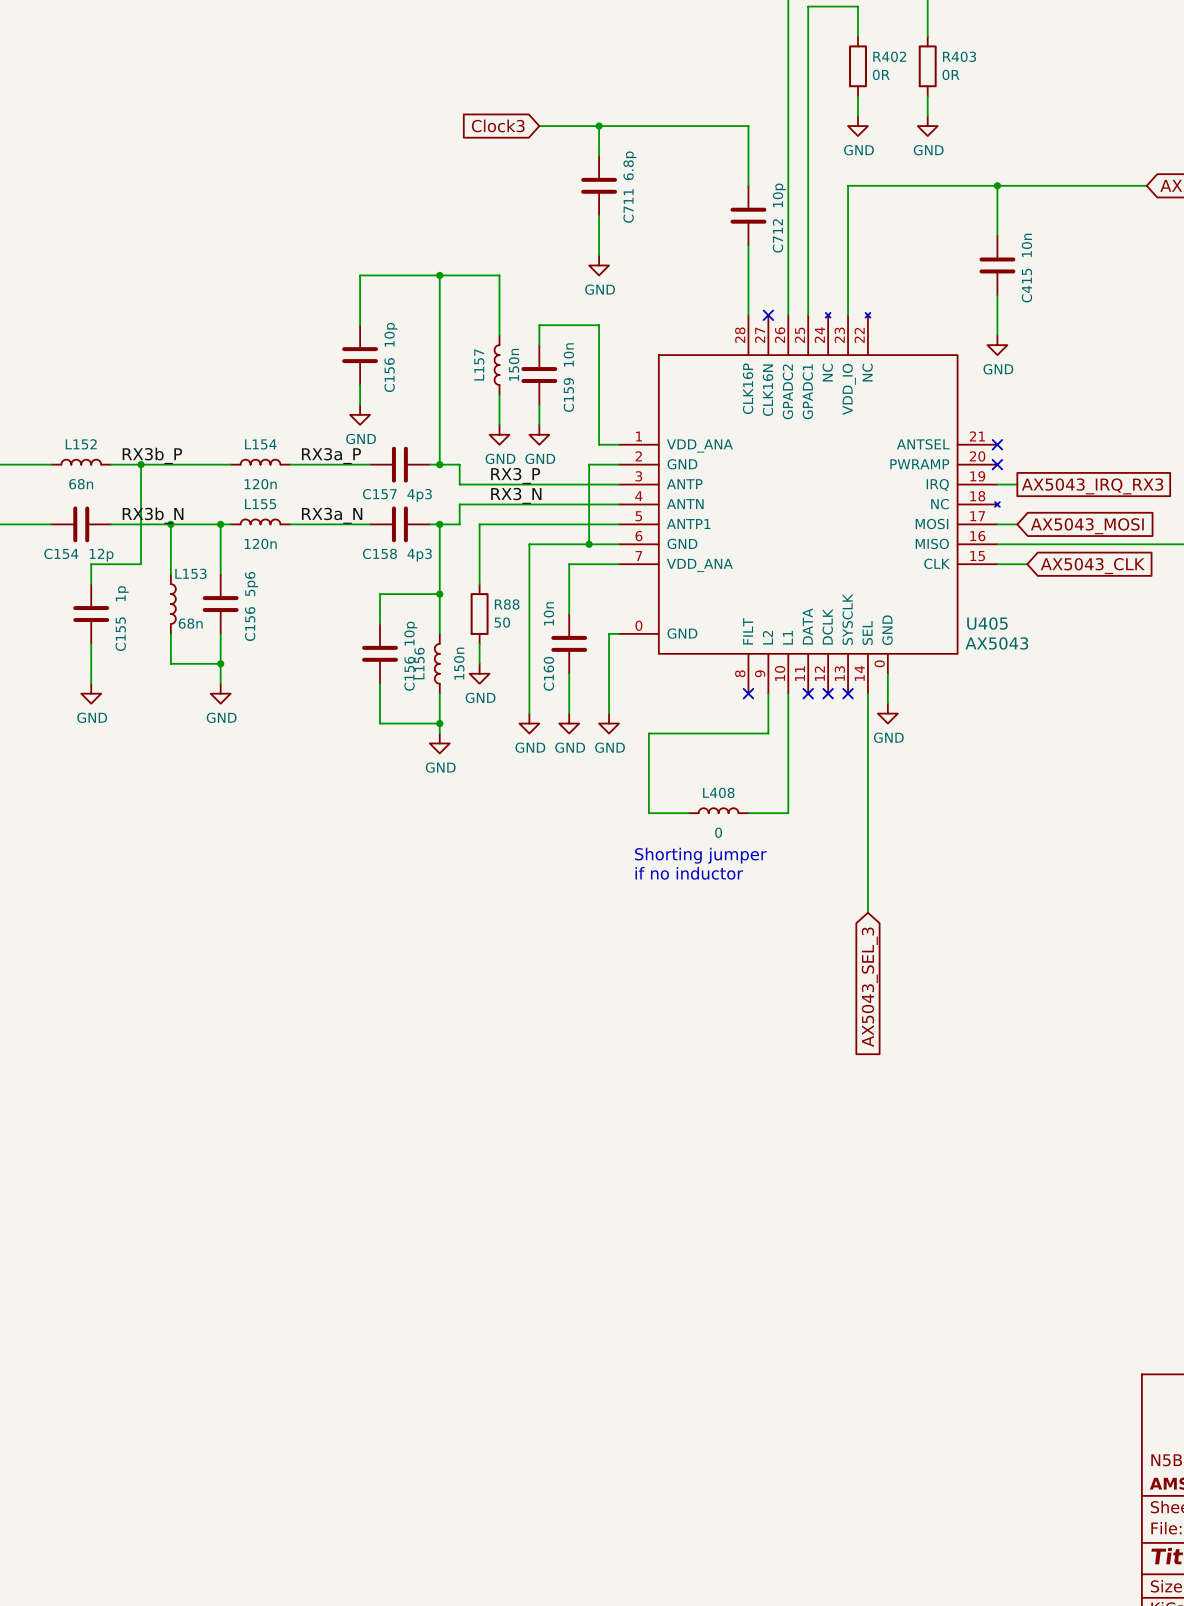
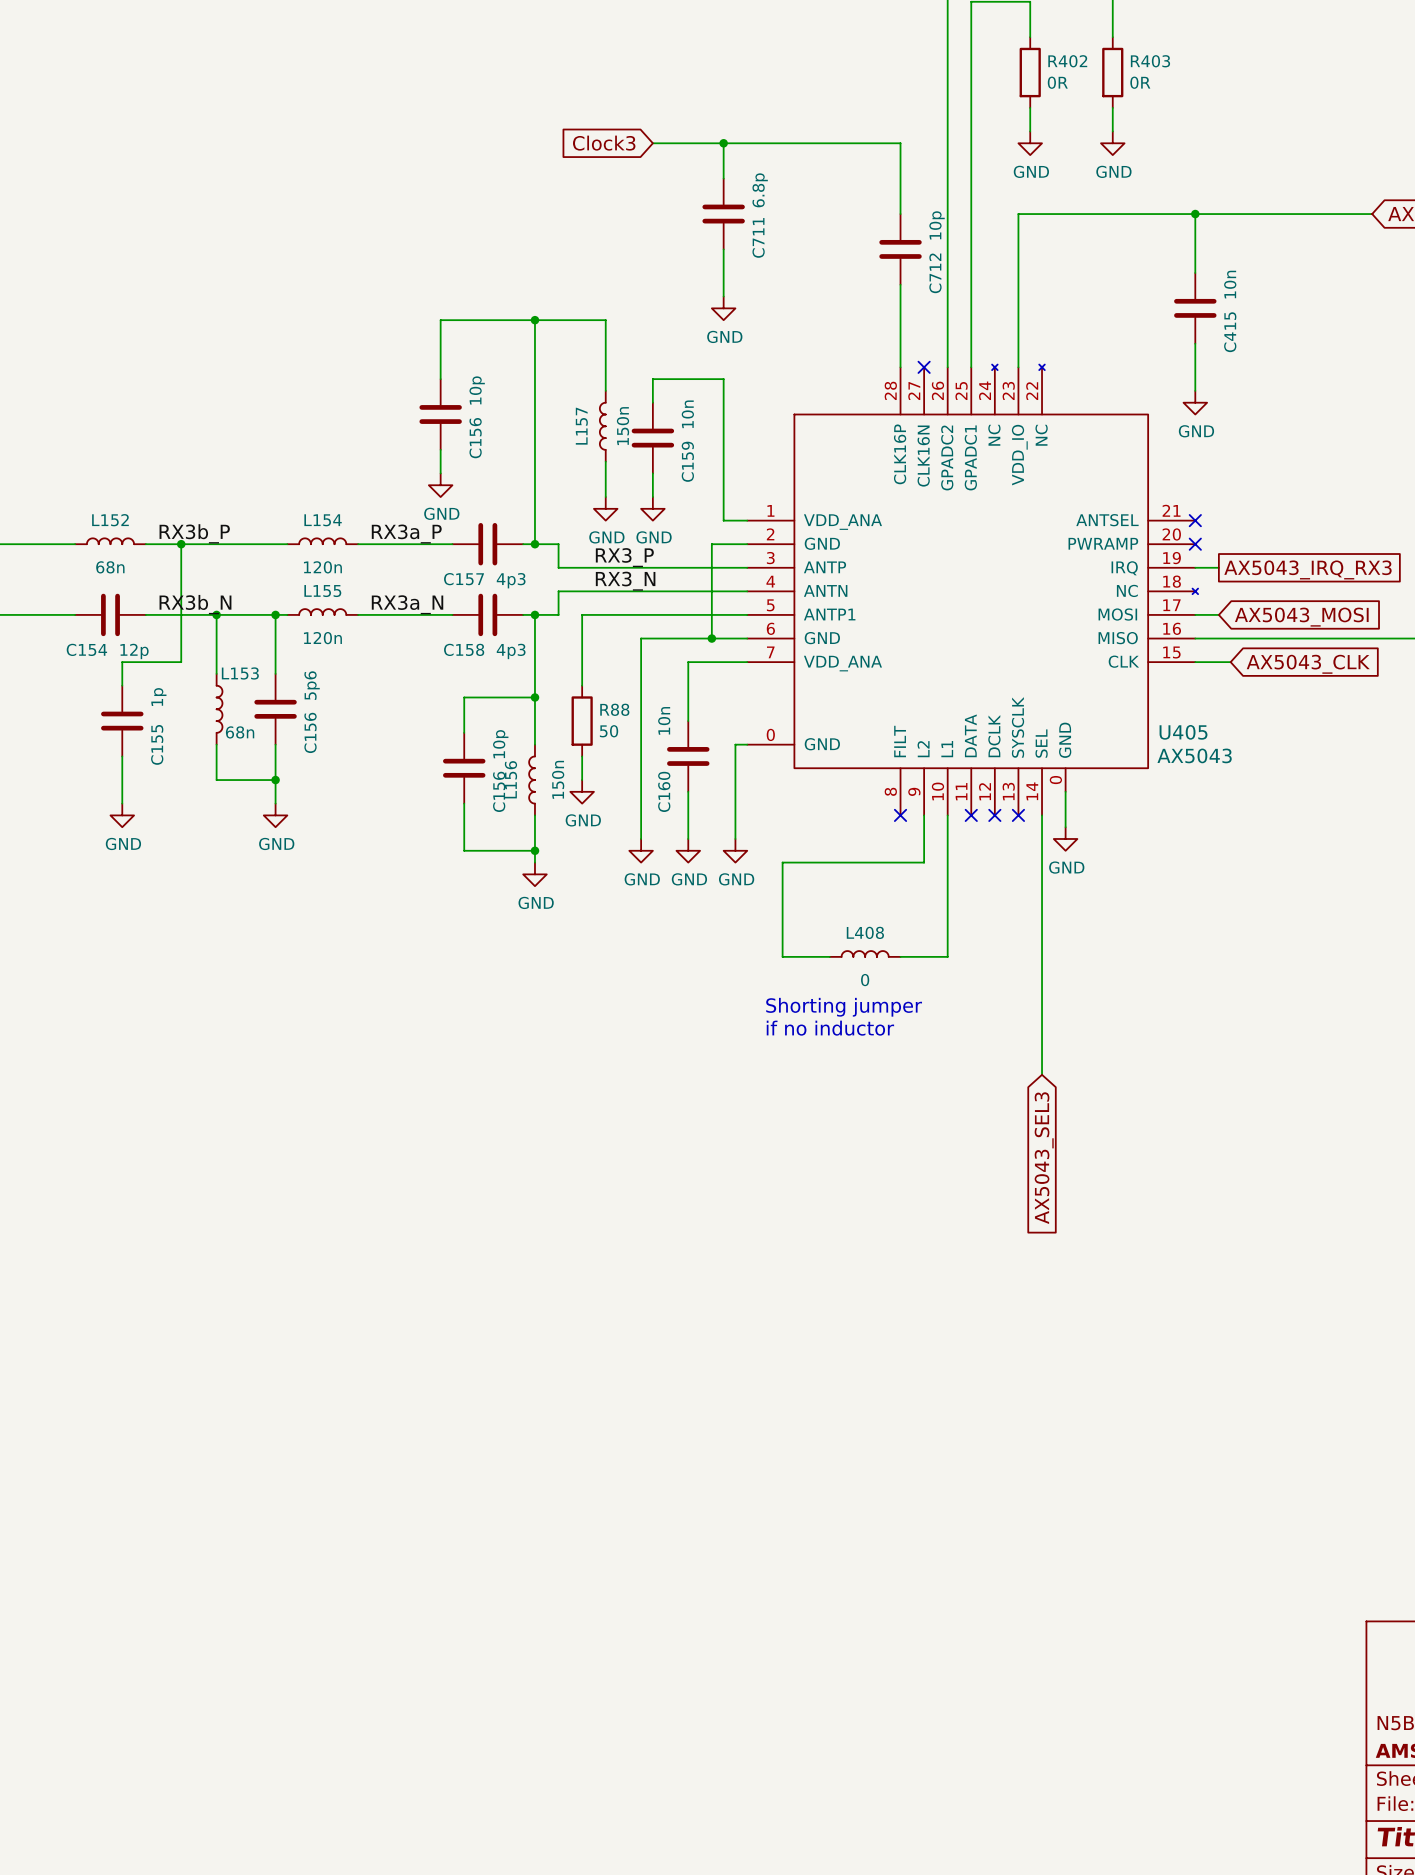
global label: AX5043_SEL_3 (869, 987) -> AX5043_SEL3 (1044, 1158)

